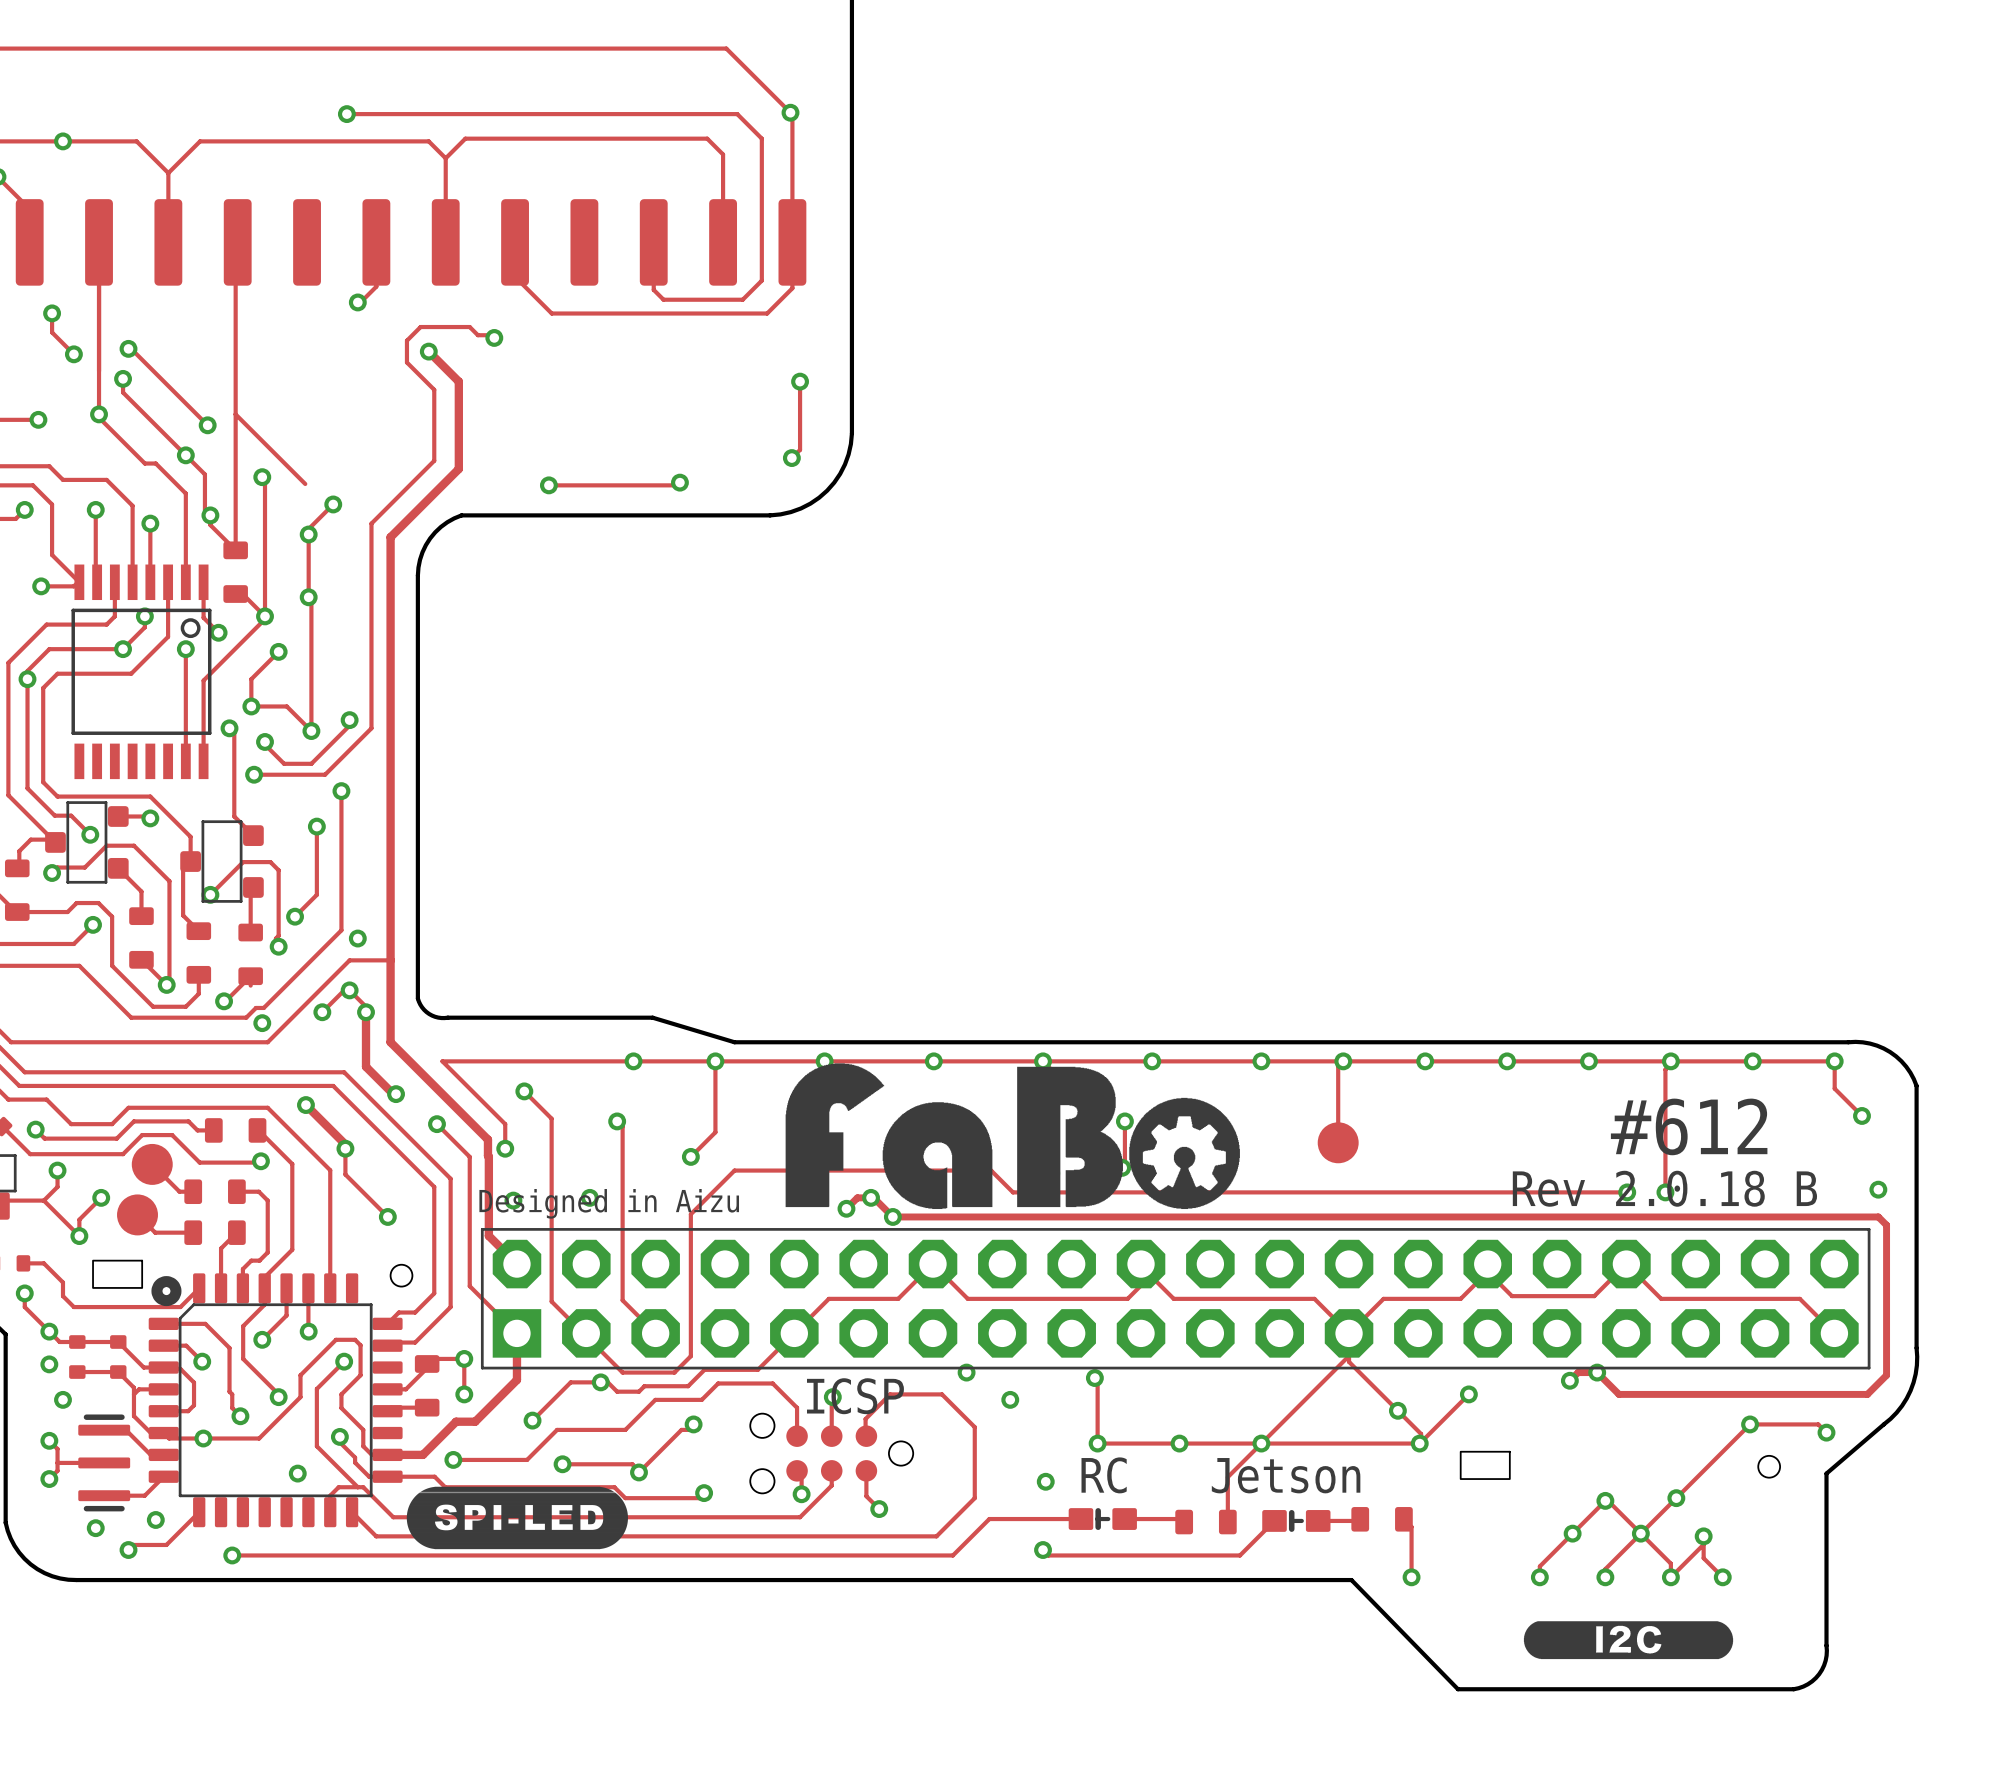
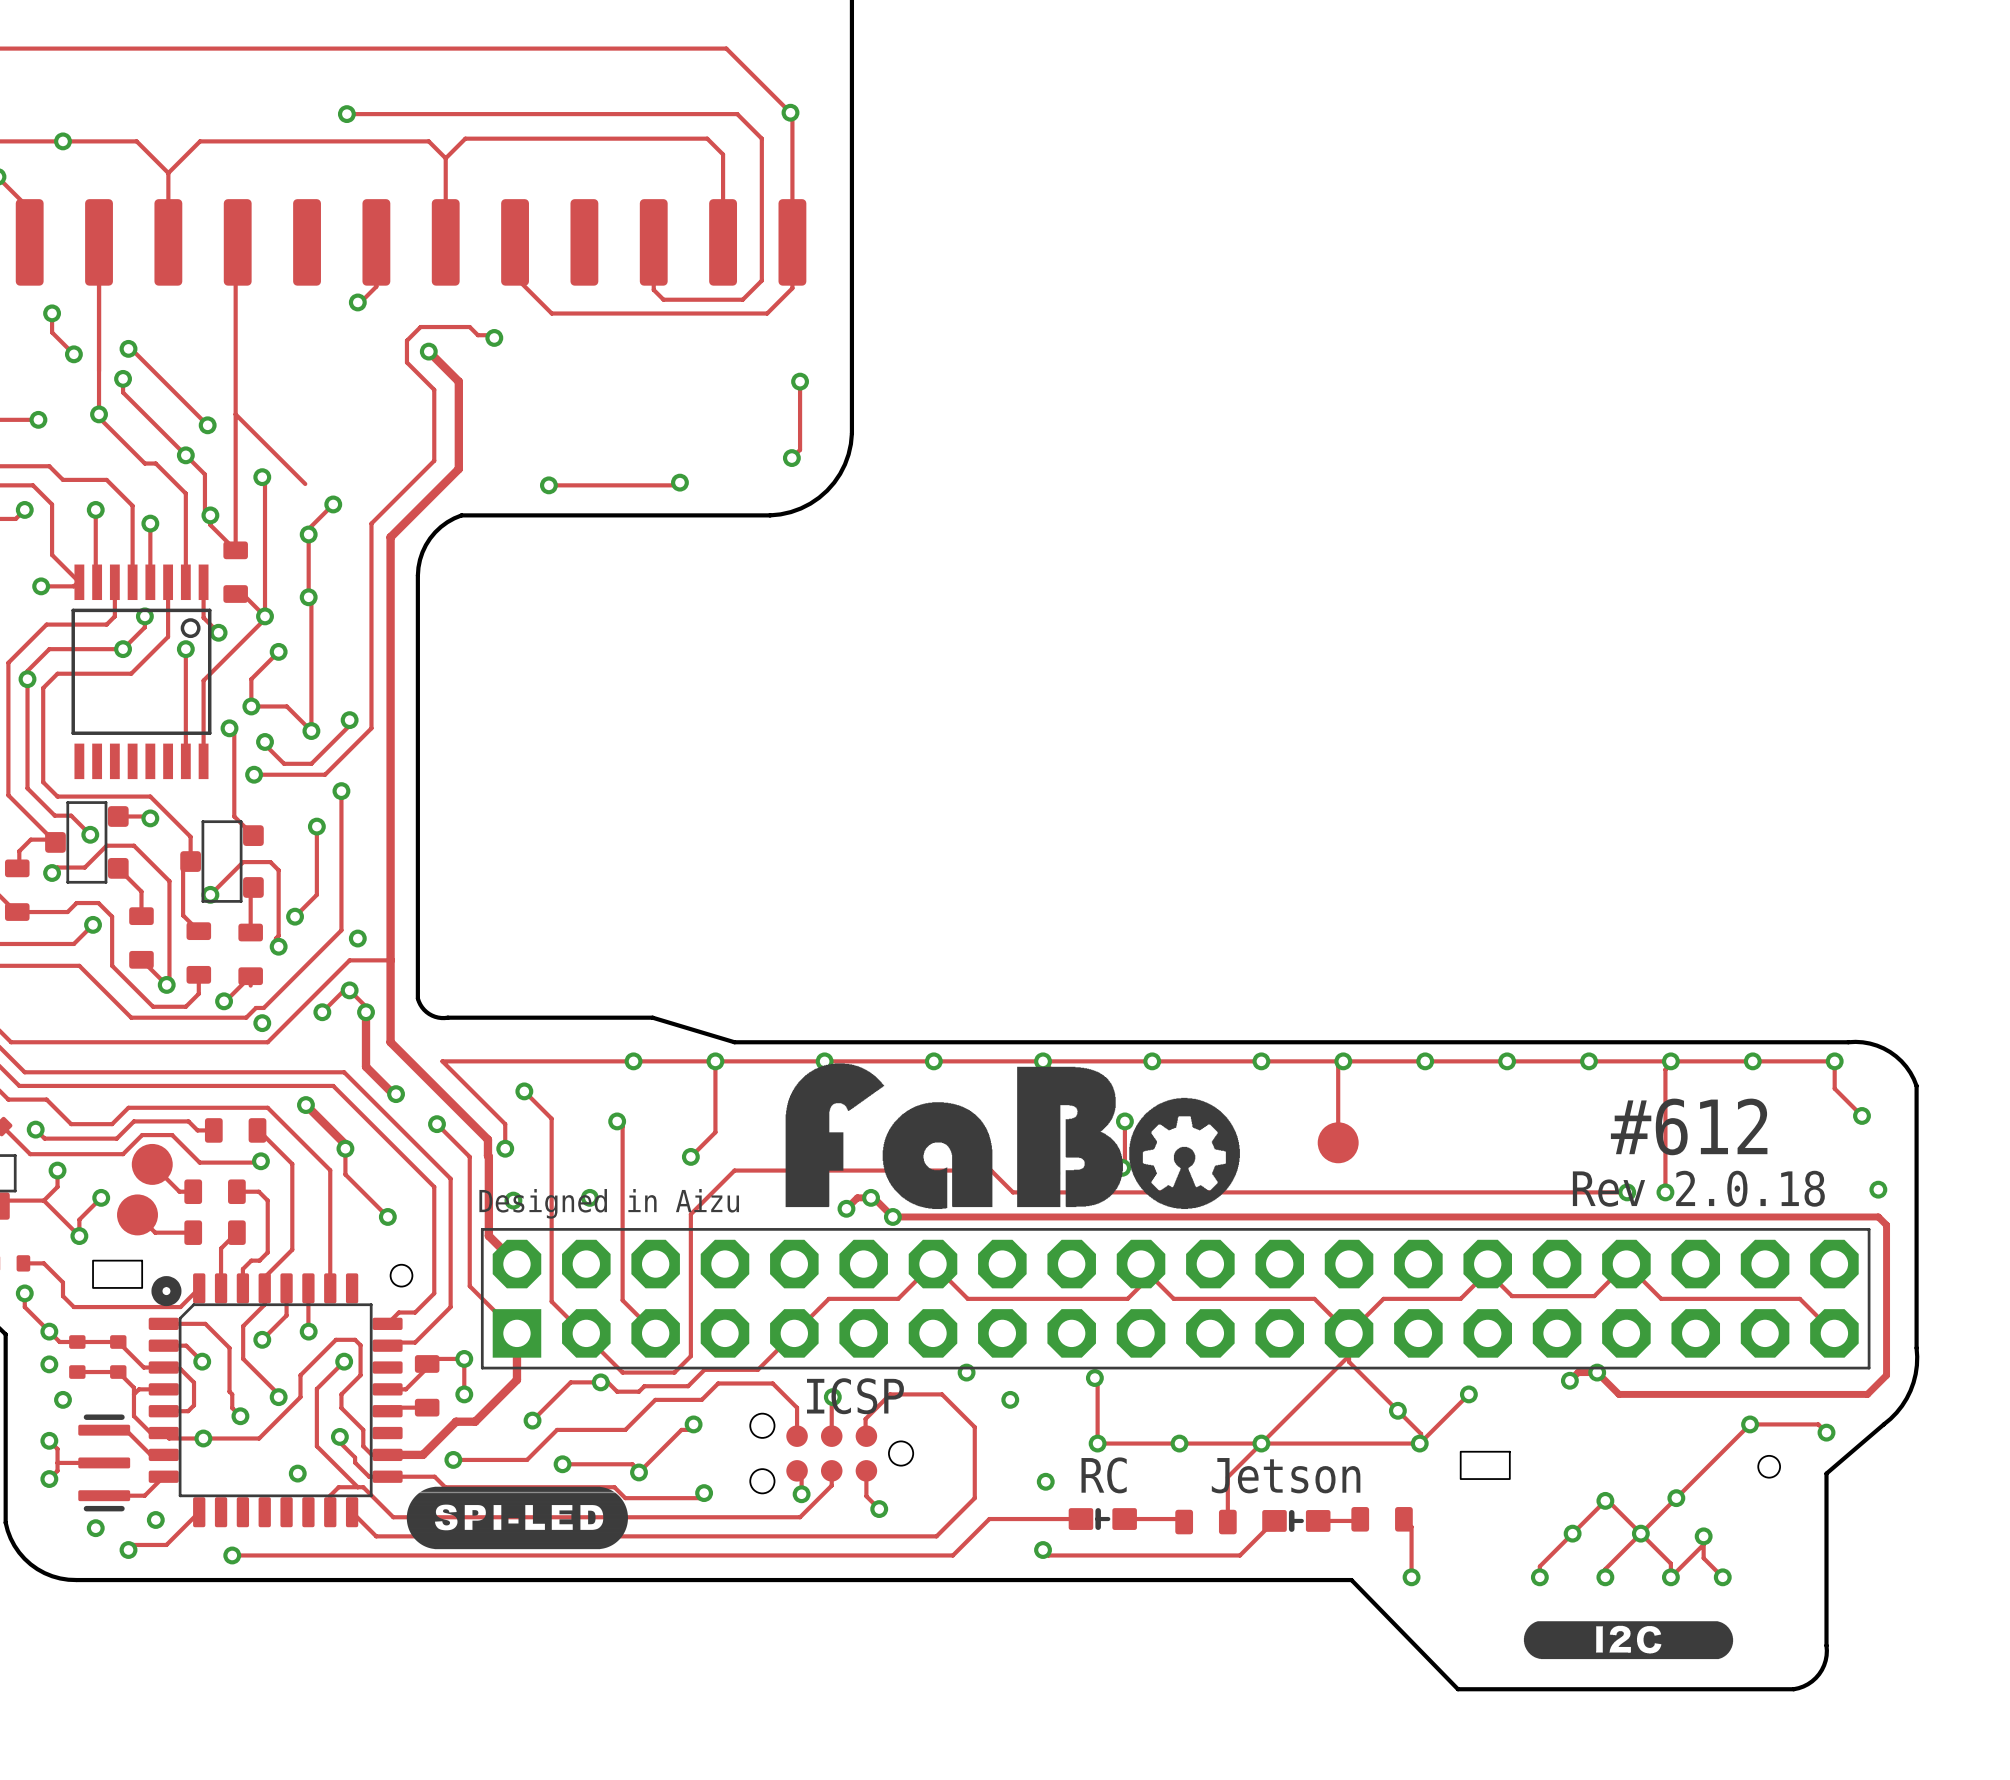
text: Rev 2.0.18 B (1664, 1188) -> Rev 2.0.18 (1698, 1188)

